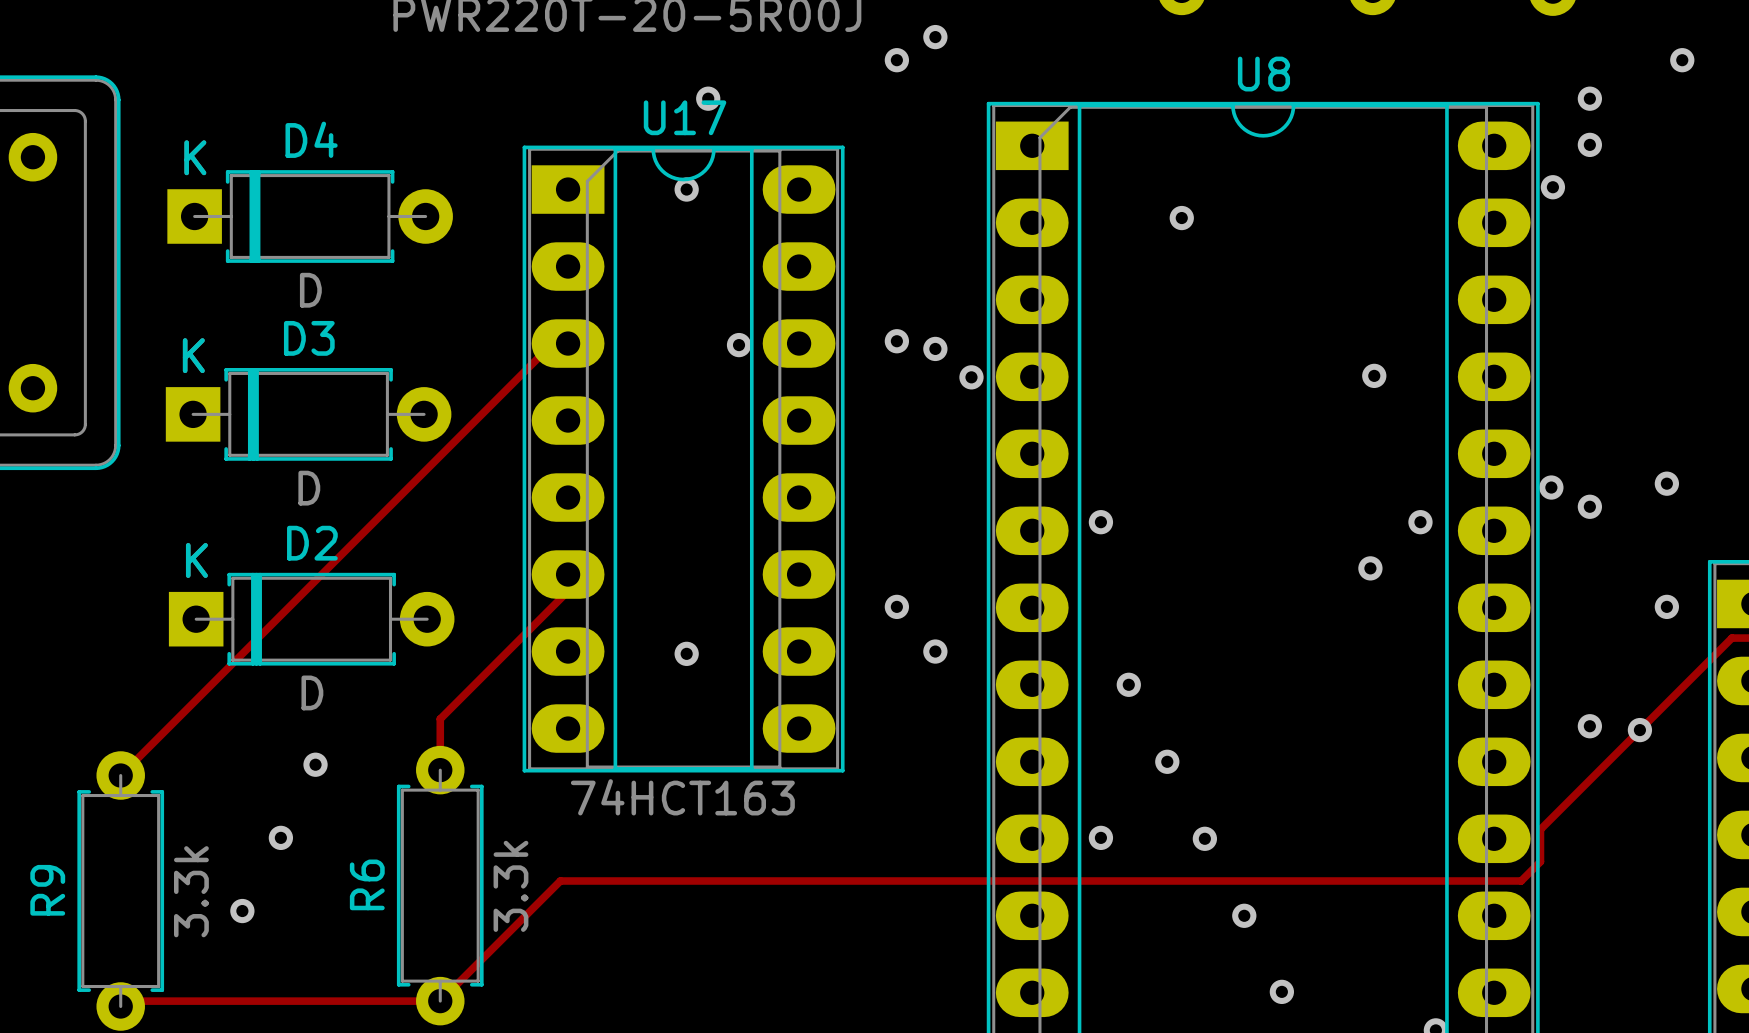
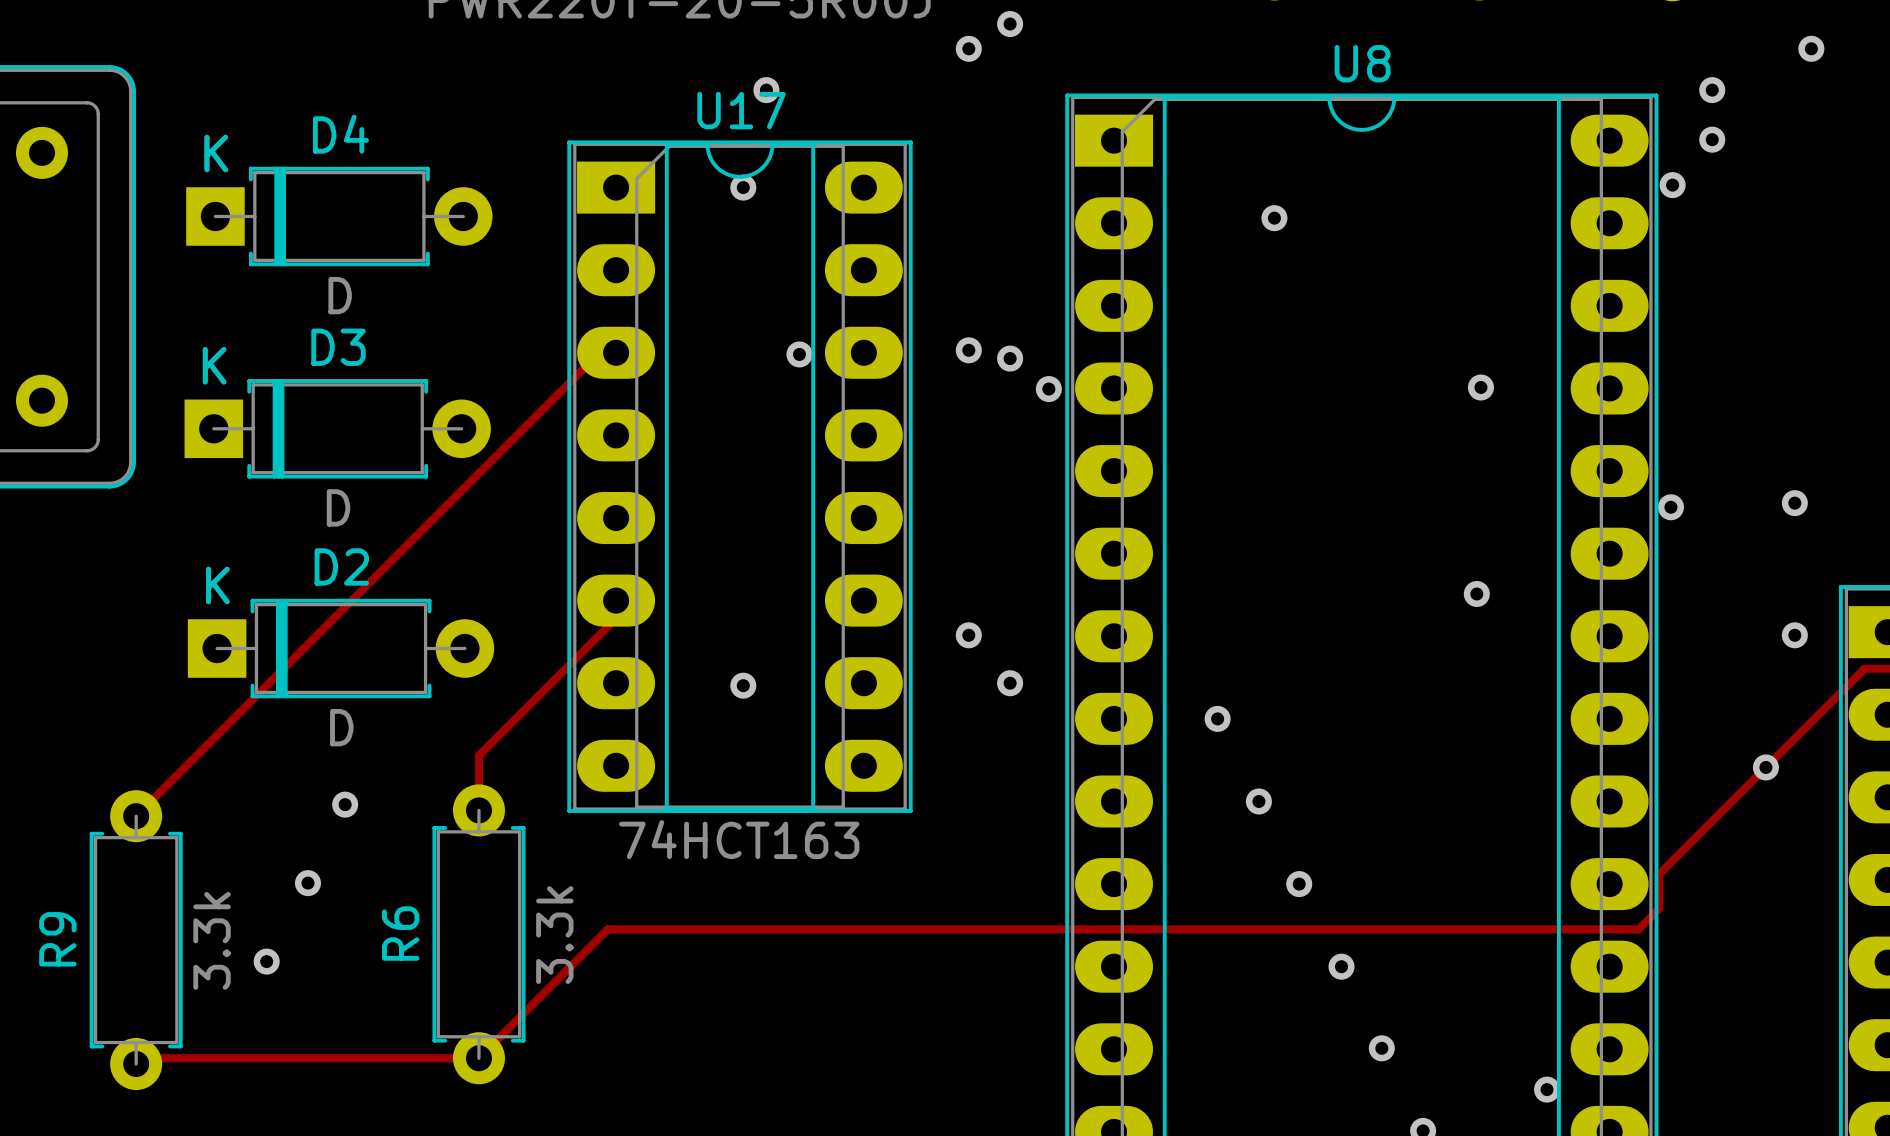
via: (1589, 506) -> none
via: (1100, 522) -> none
via: (1420, 522) -> none
via: (1589, 726) -> none
via: (1100, 837) -> none

